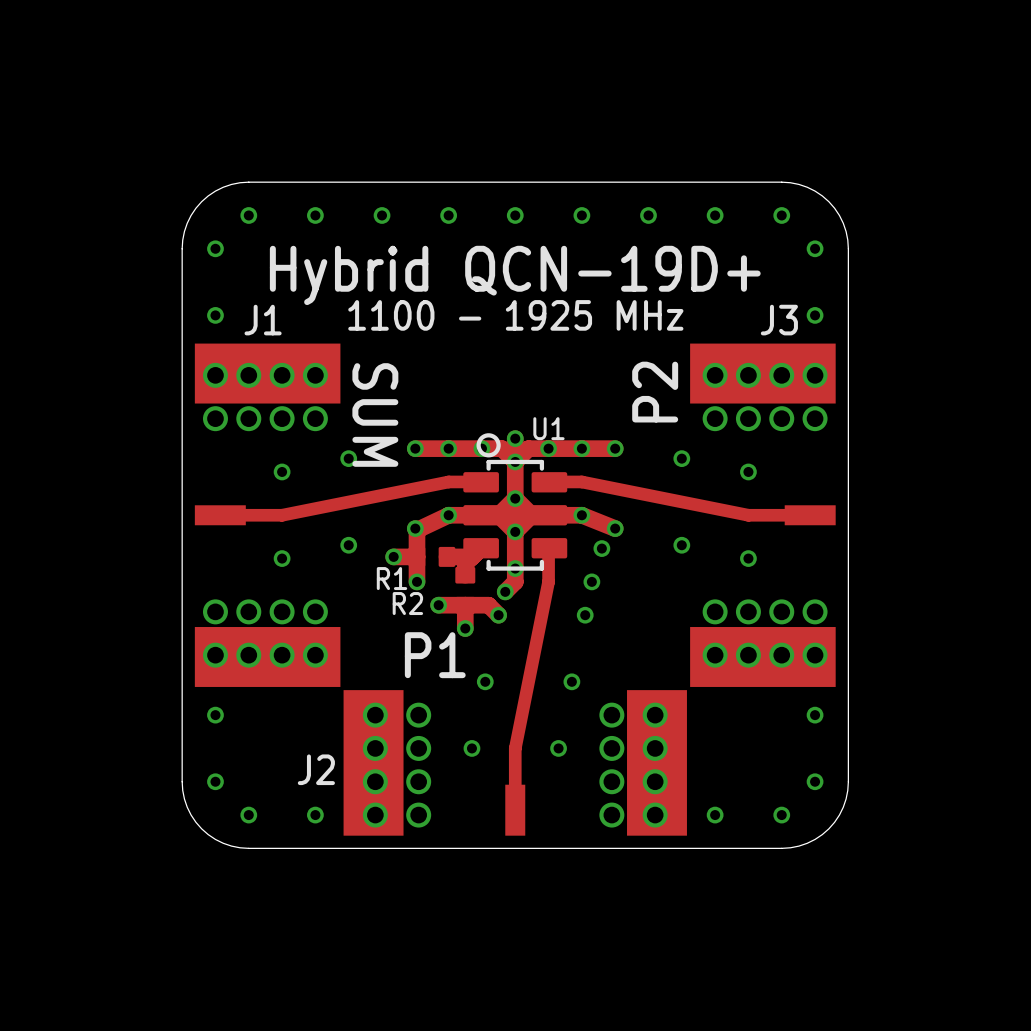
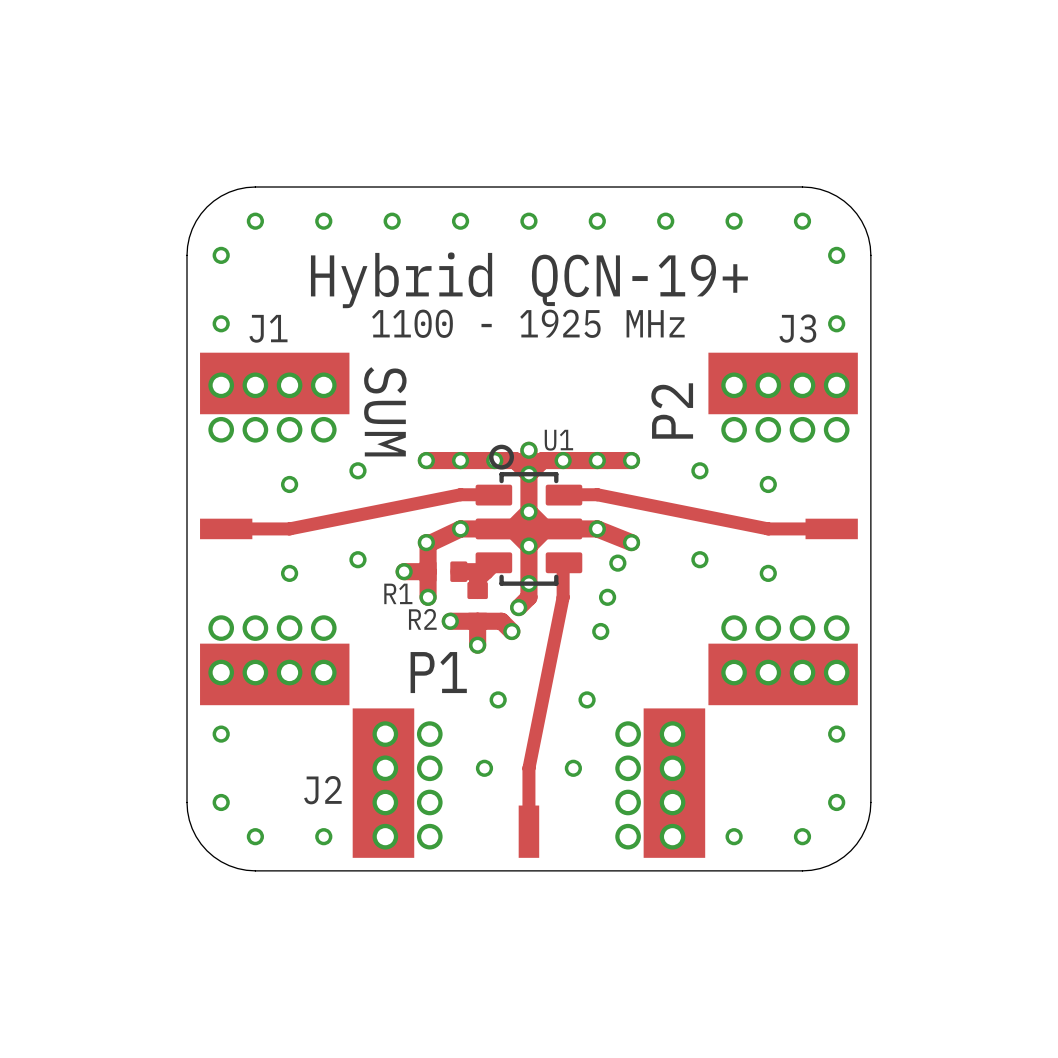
text: Hybrid QCN-19D+ (515, 275) -> Hybrid QCN-19+ (529, 280)

